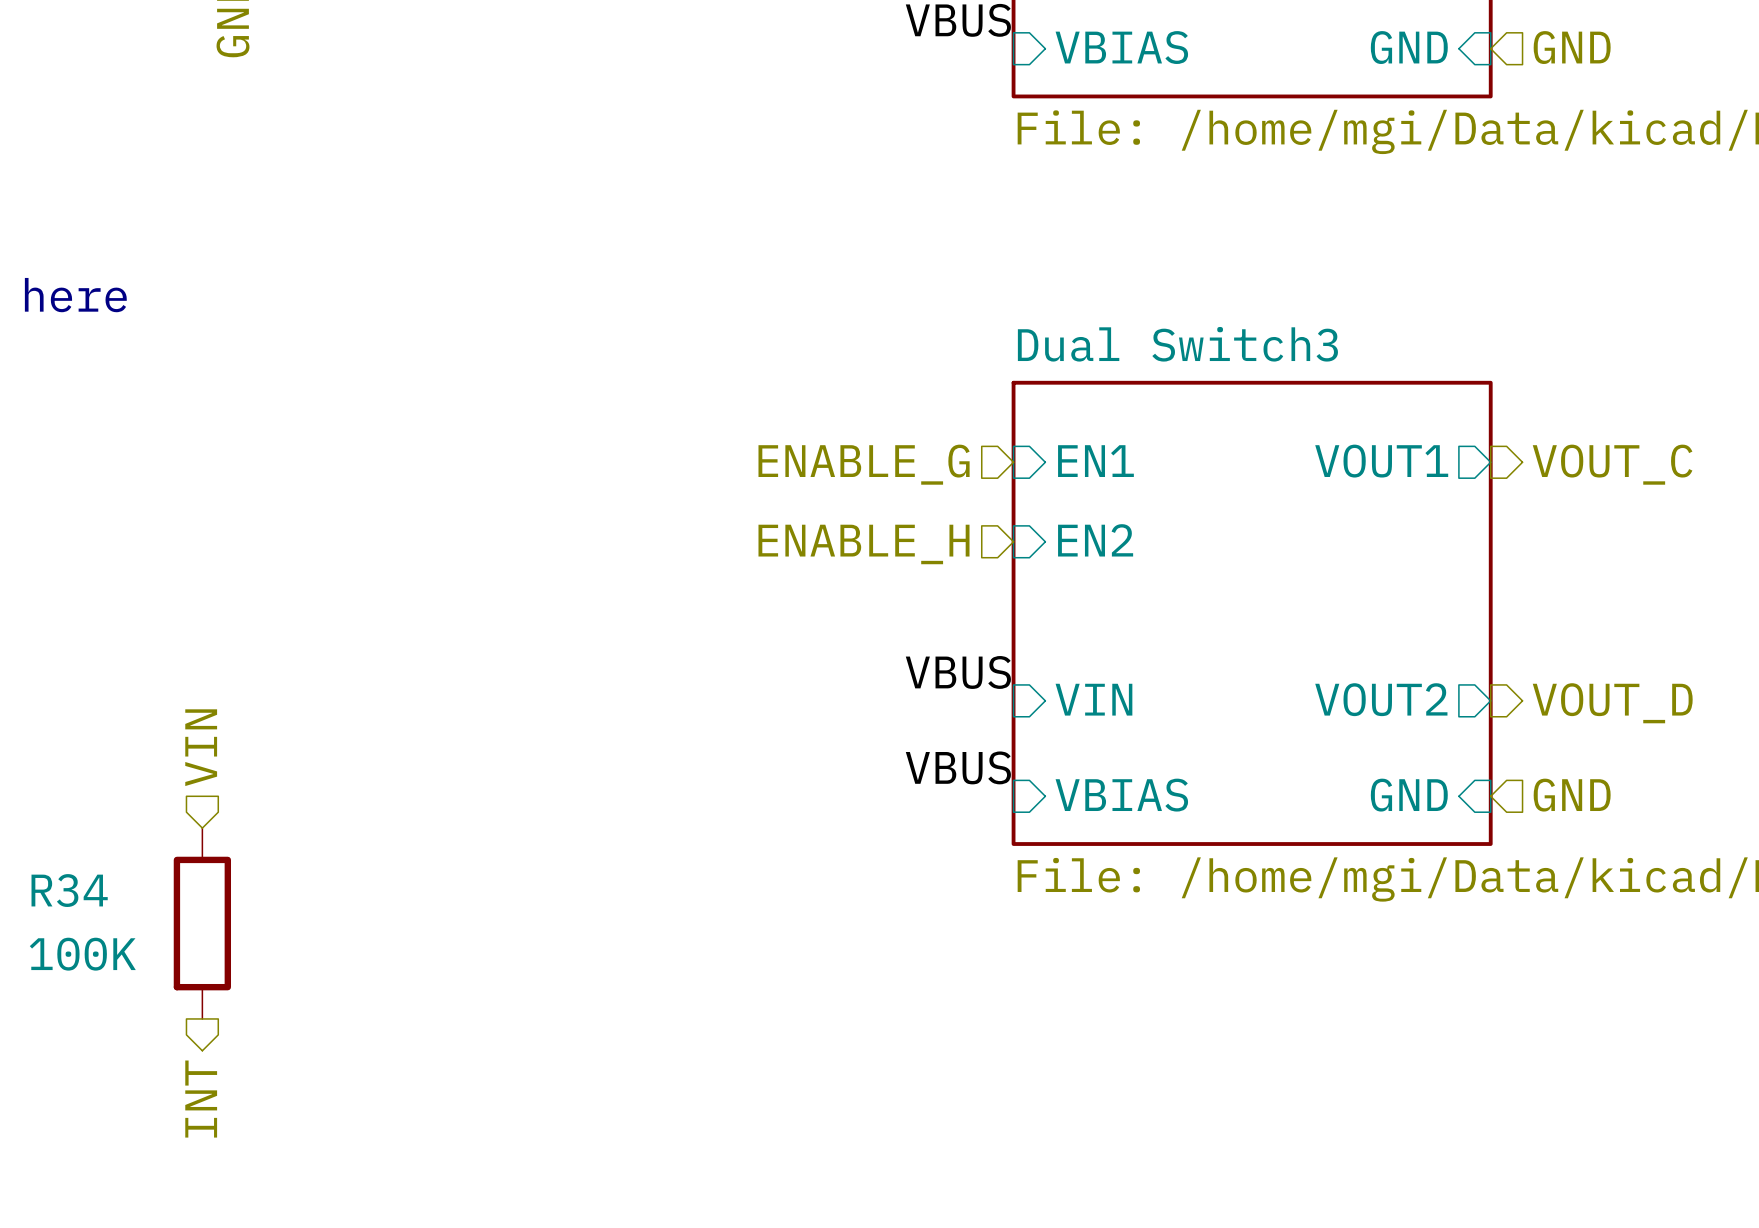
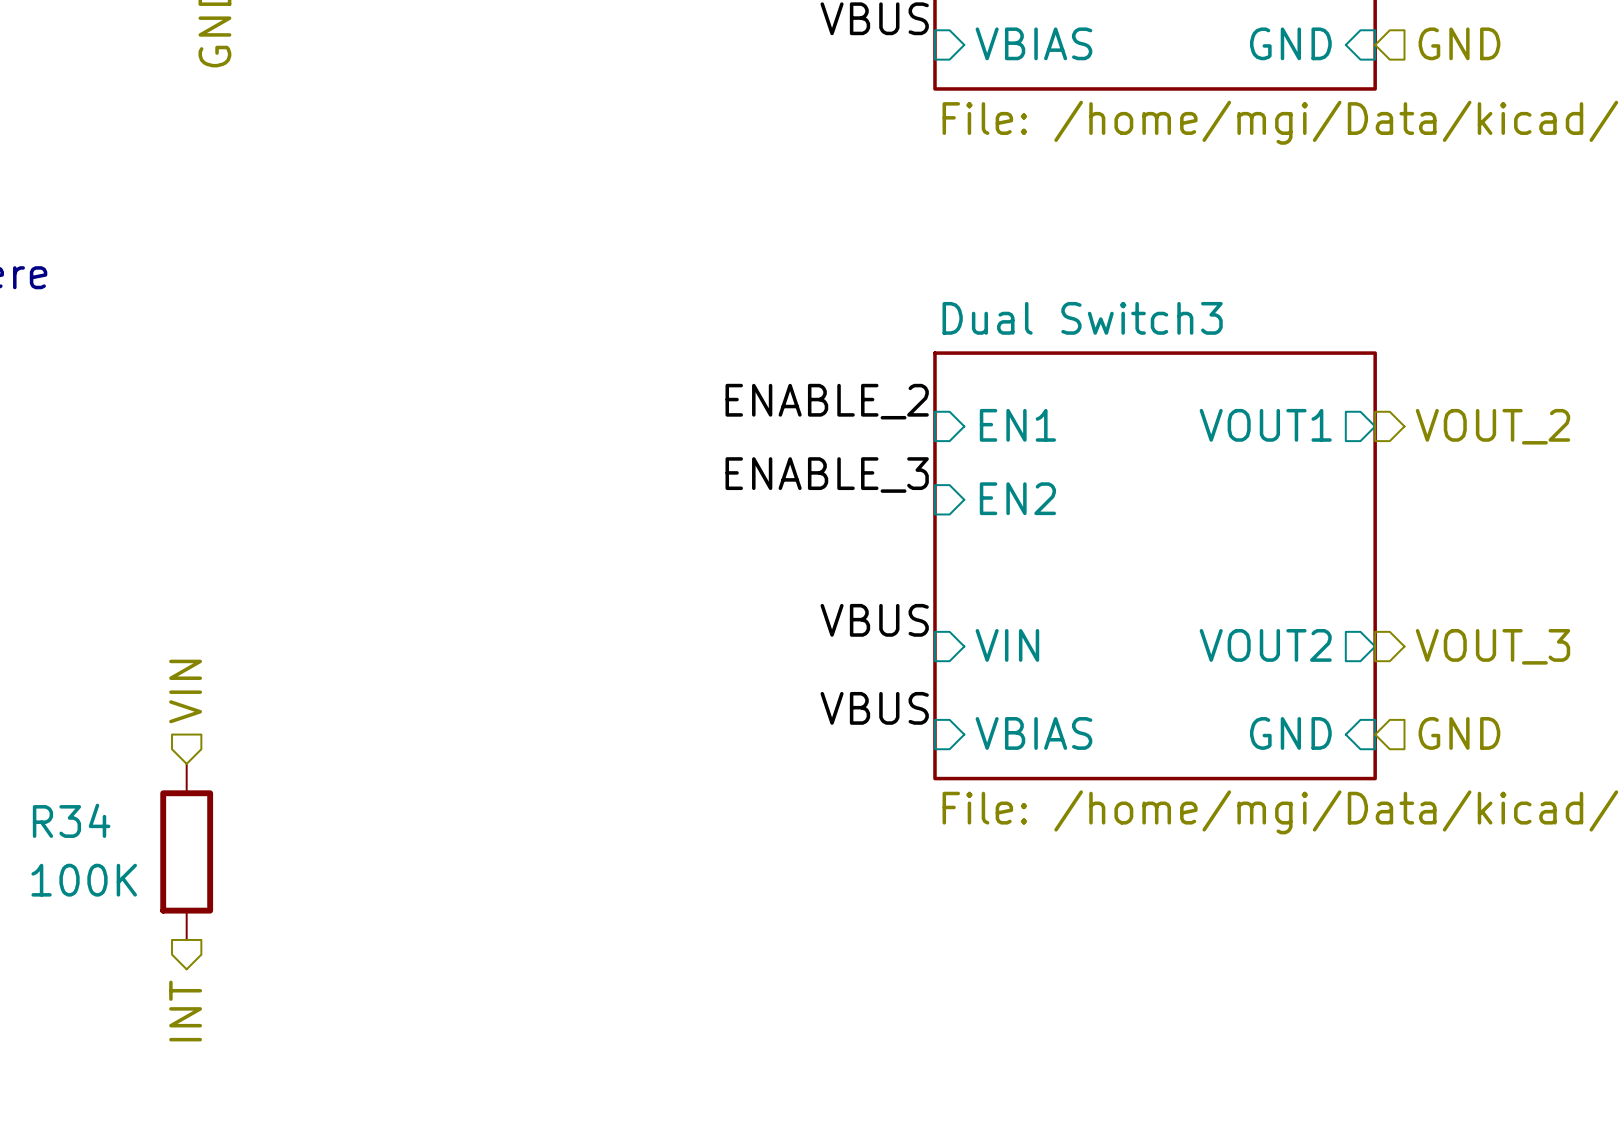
label: none -> ENABLE_2 (827, 401)
hierarchical label: ENABLE_G (864, 464) -> none
hierarchical label: VOUT_C (1612, 464) -> VOUT_2 (1492, 426)
label: none -> ENABLE_3 (827, 475)
hierarchical label: ENABLE_H (864, 544) -> none
hierarchical label: VOUT_D (1612, 703) -> VOUT_3 (1492, 646)

